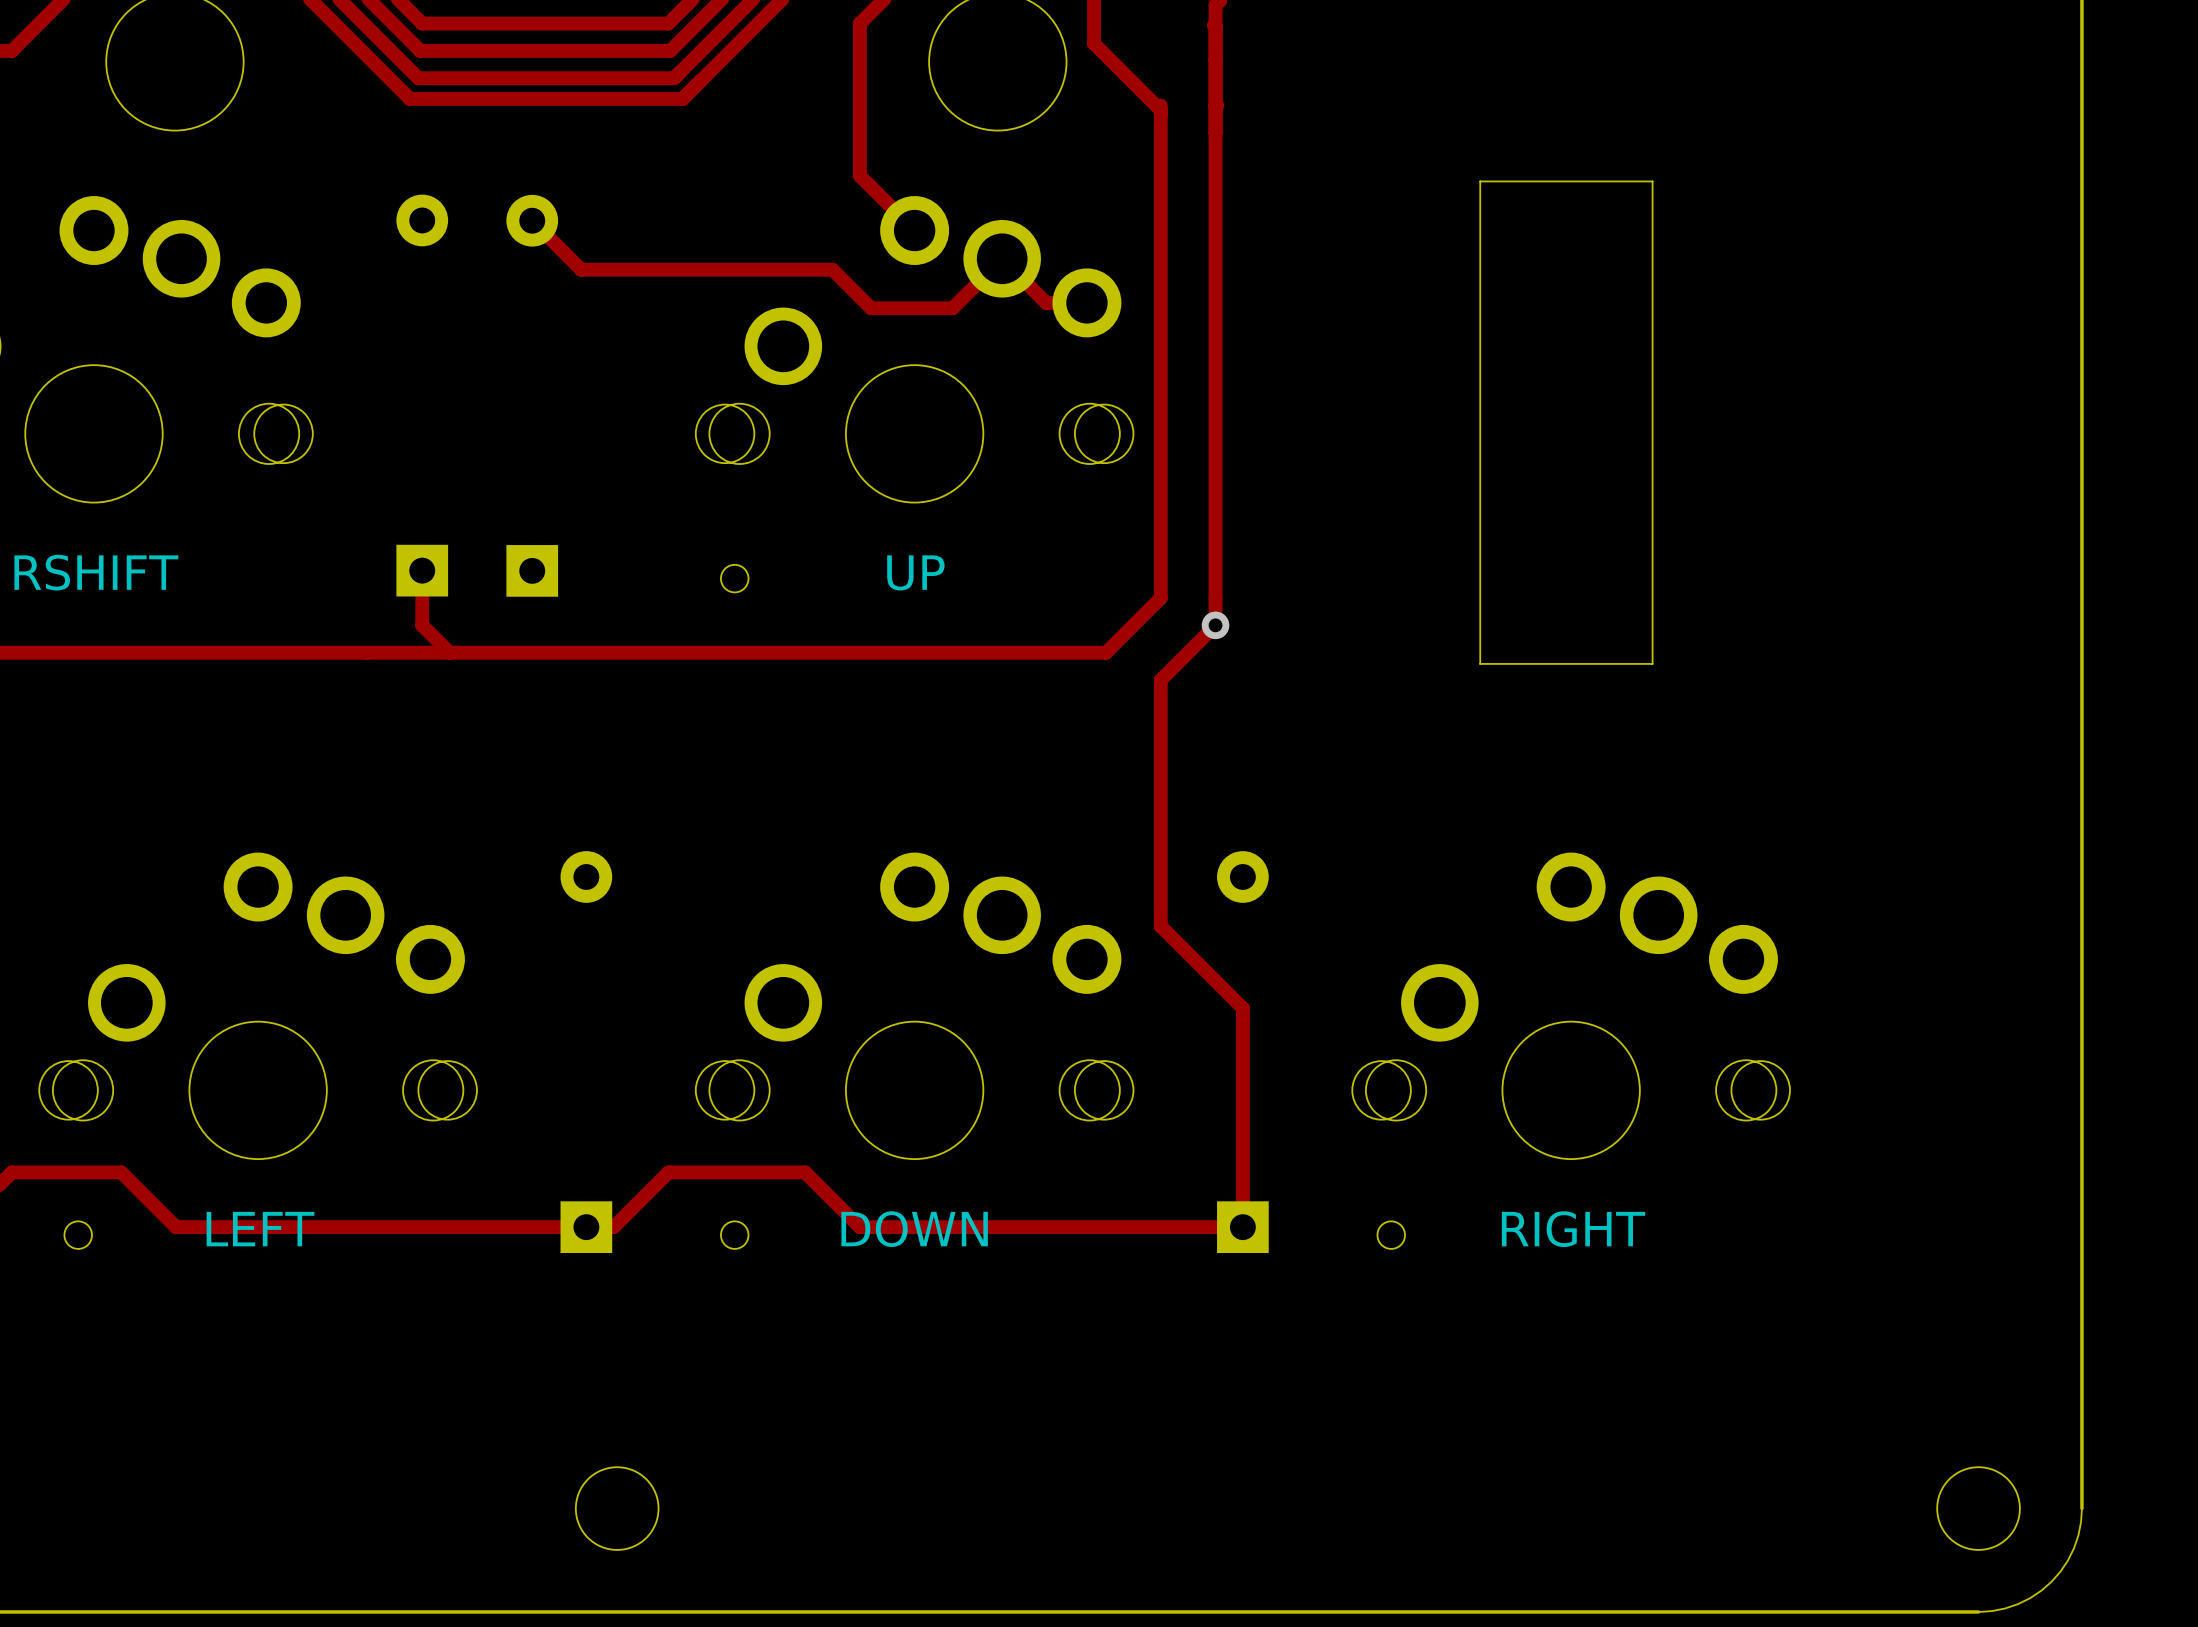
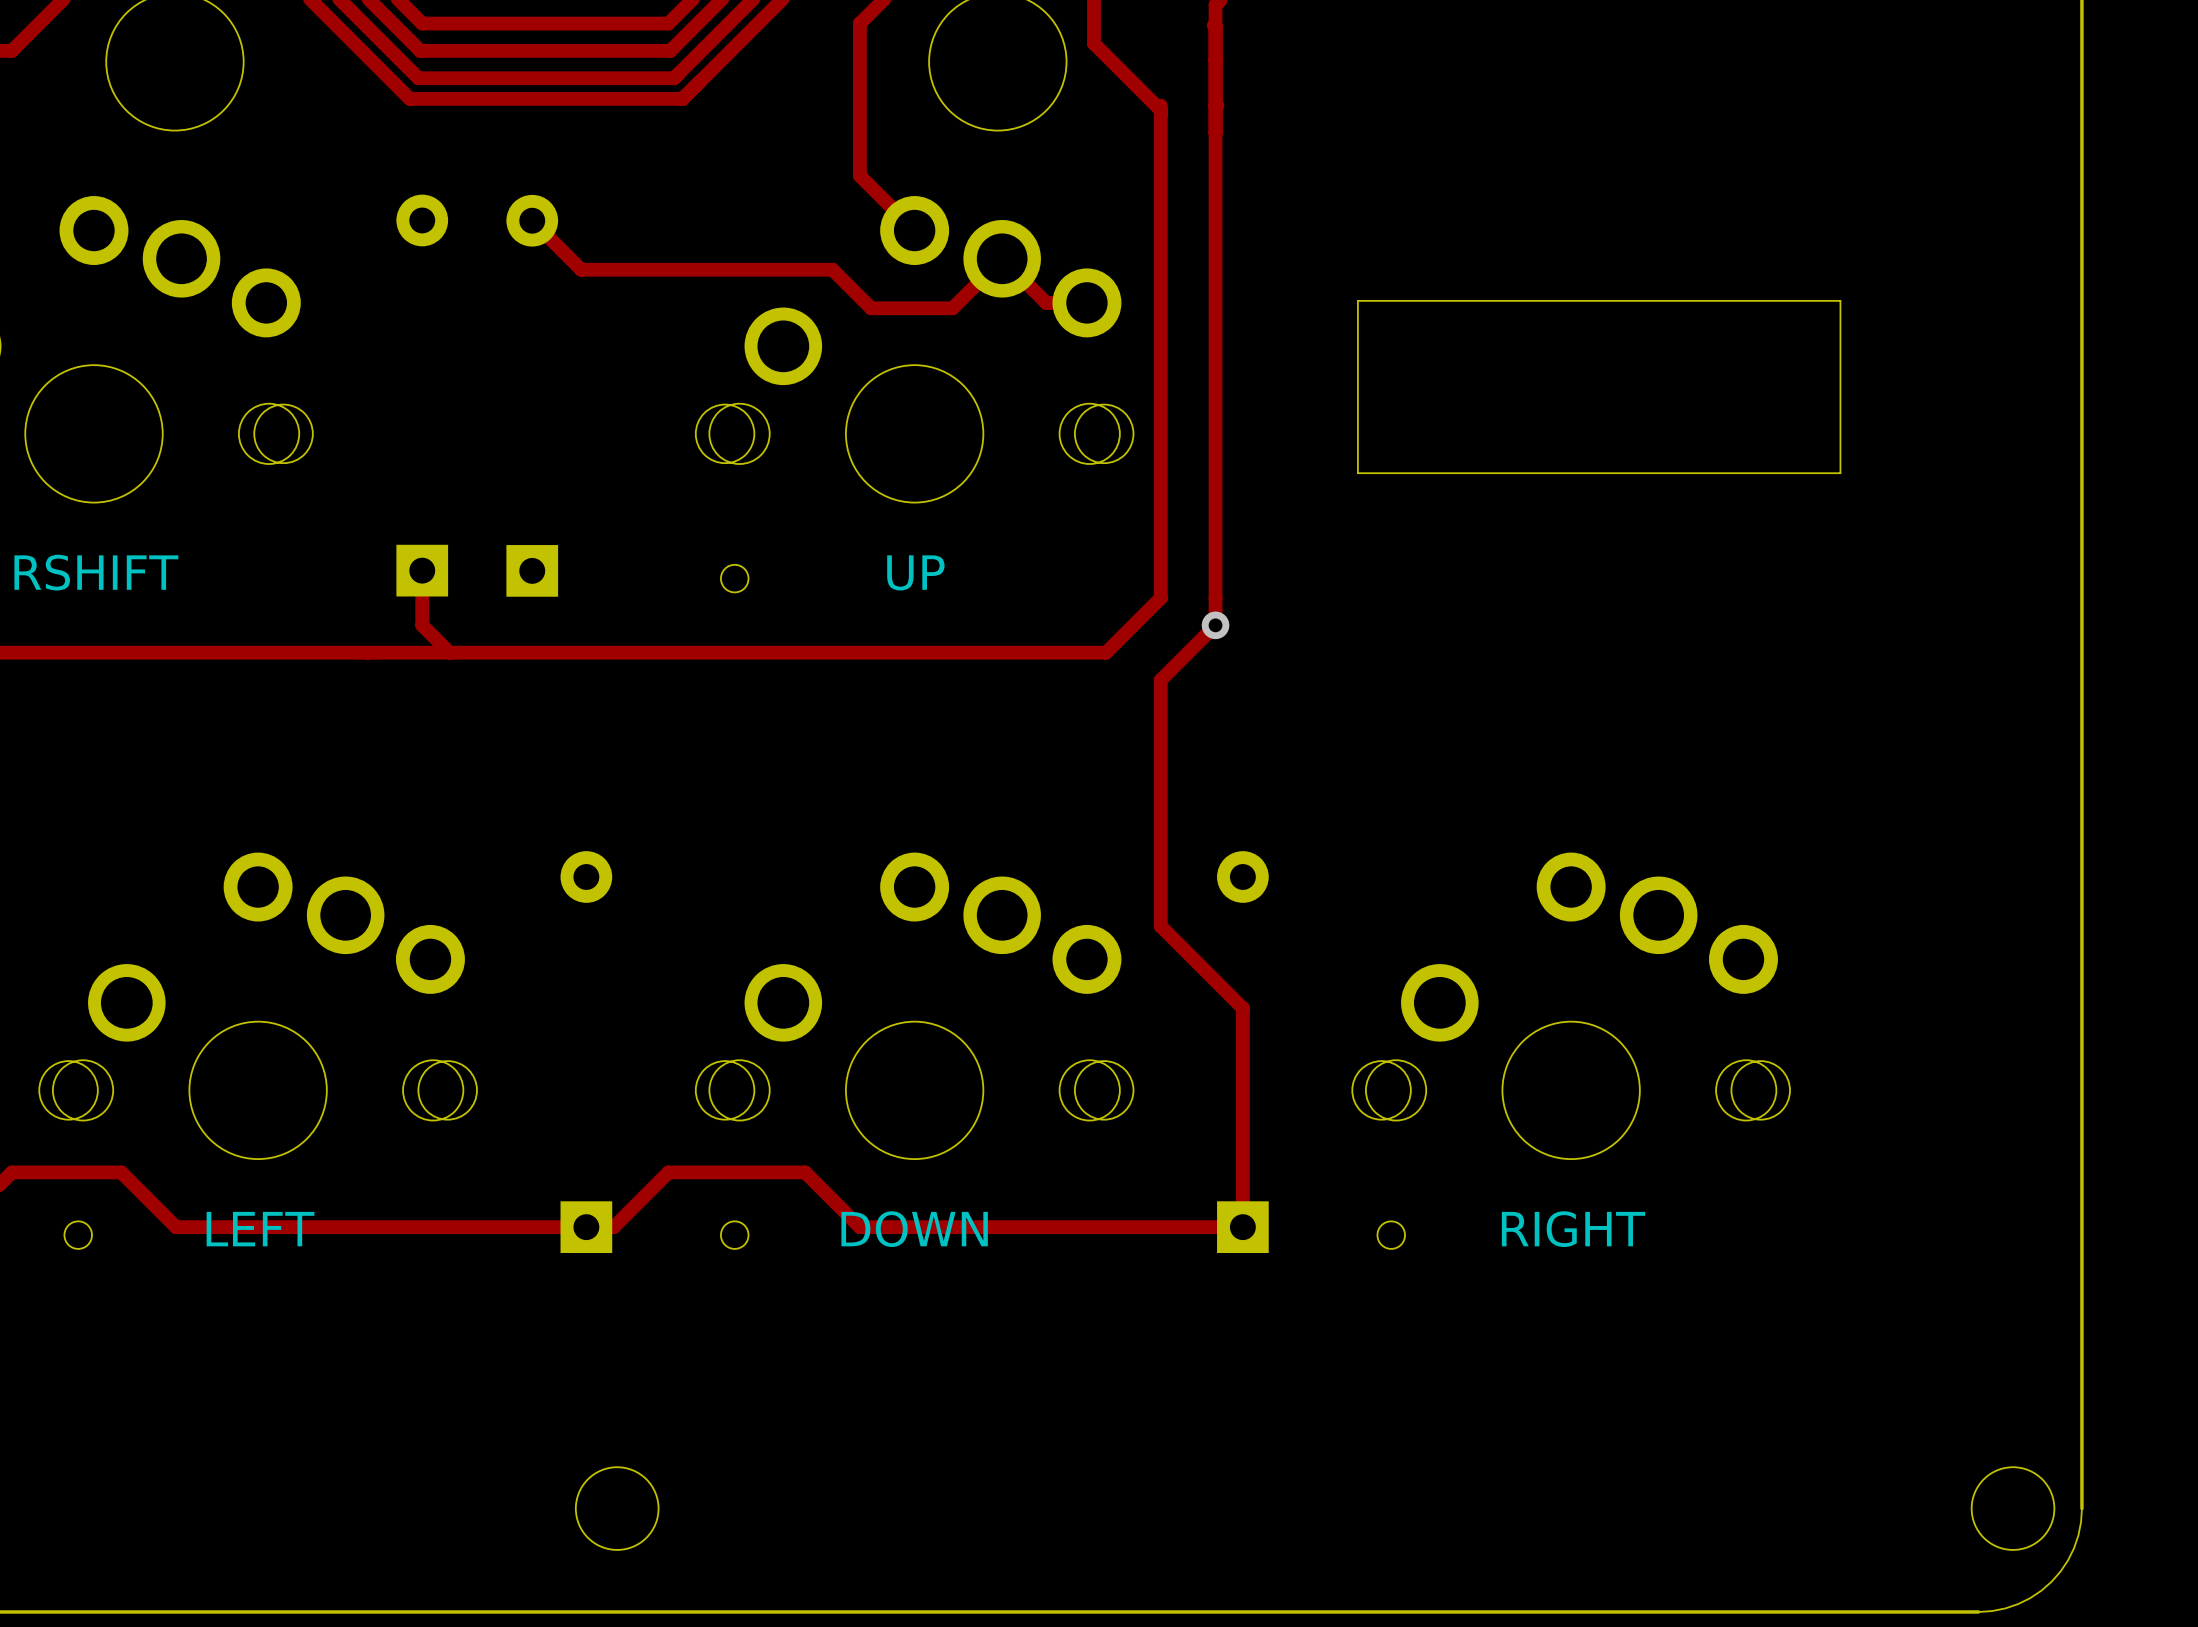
board edge: (1480, 181) (1652, 181) (1652, 663) (1480, 663) (1480, 181) -> none
board edge: none -> (1357, 300) (1357, 473) (1840, 473) (1840, 300) (1357, 300)
round board edge position: (1978, 1508) -> (2013, 1508)

